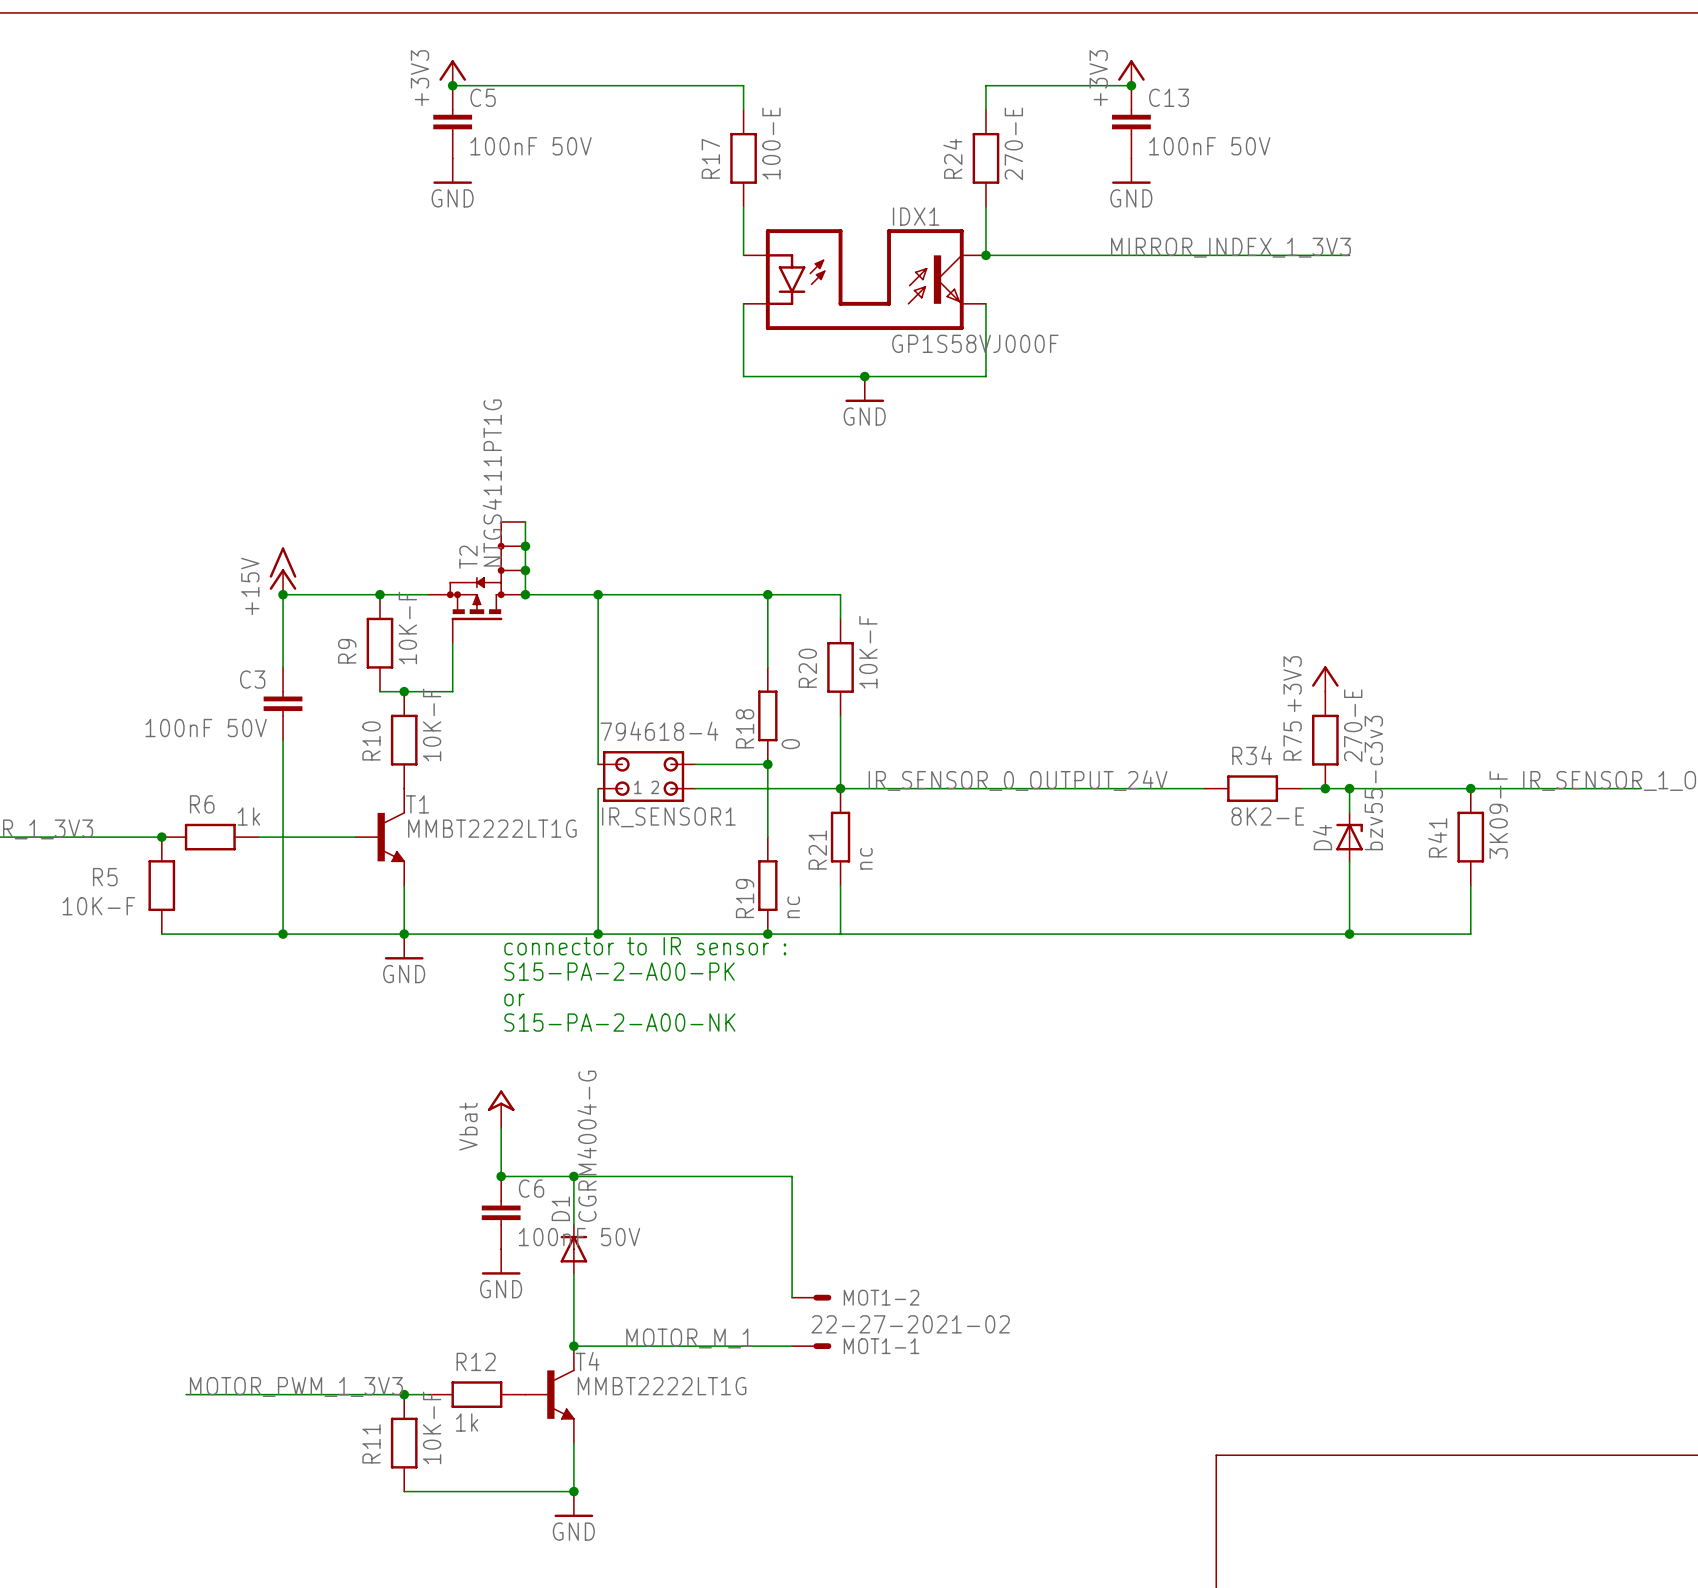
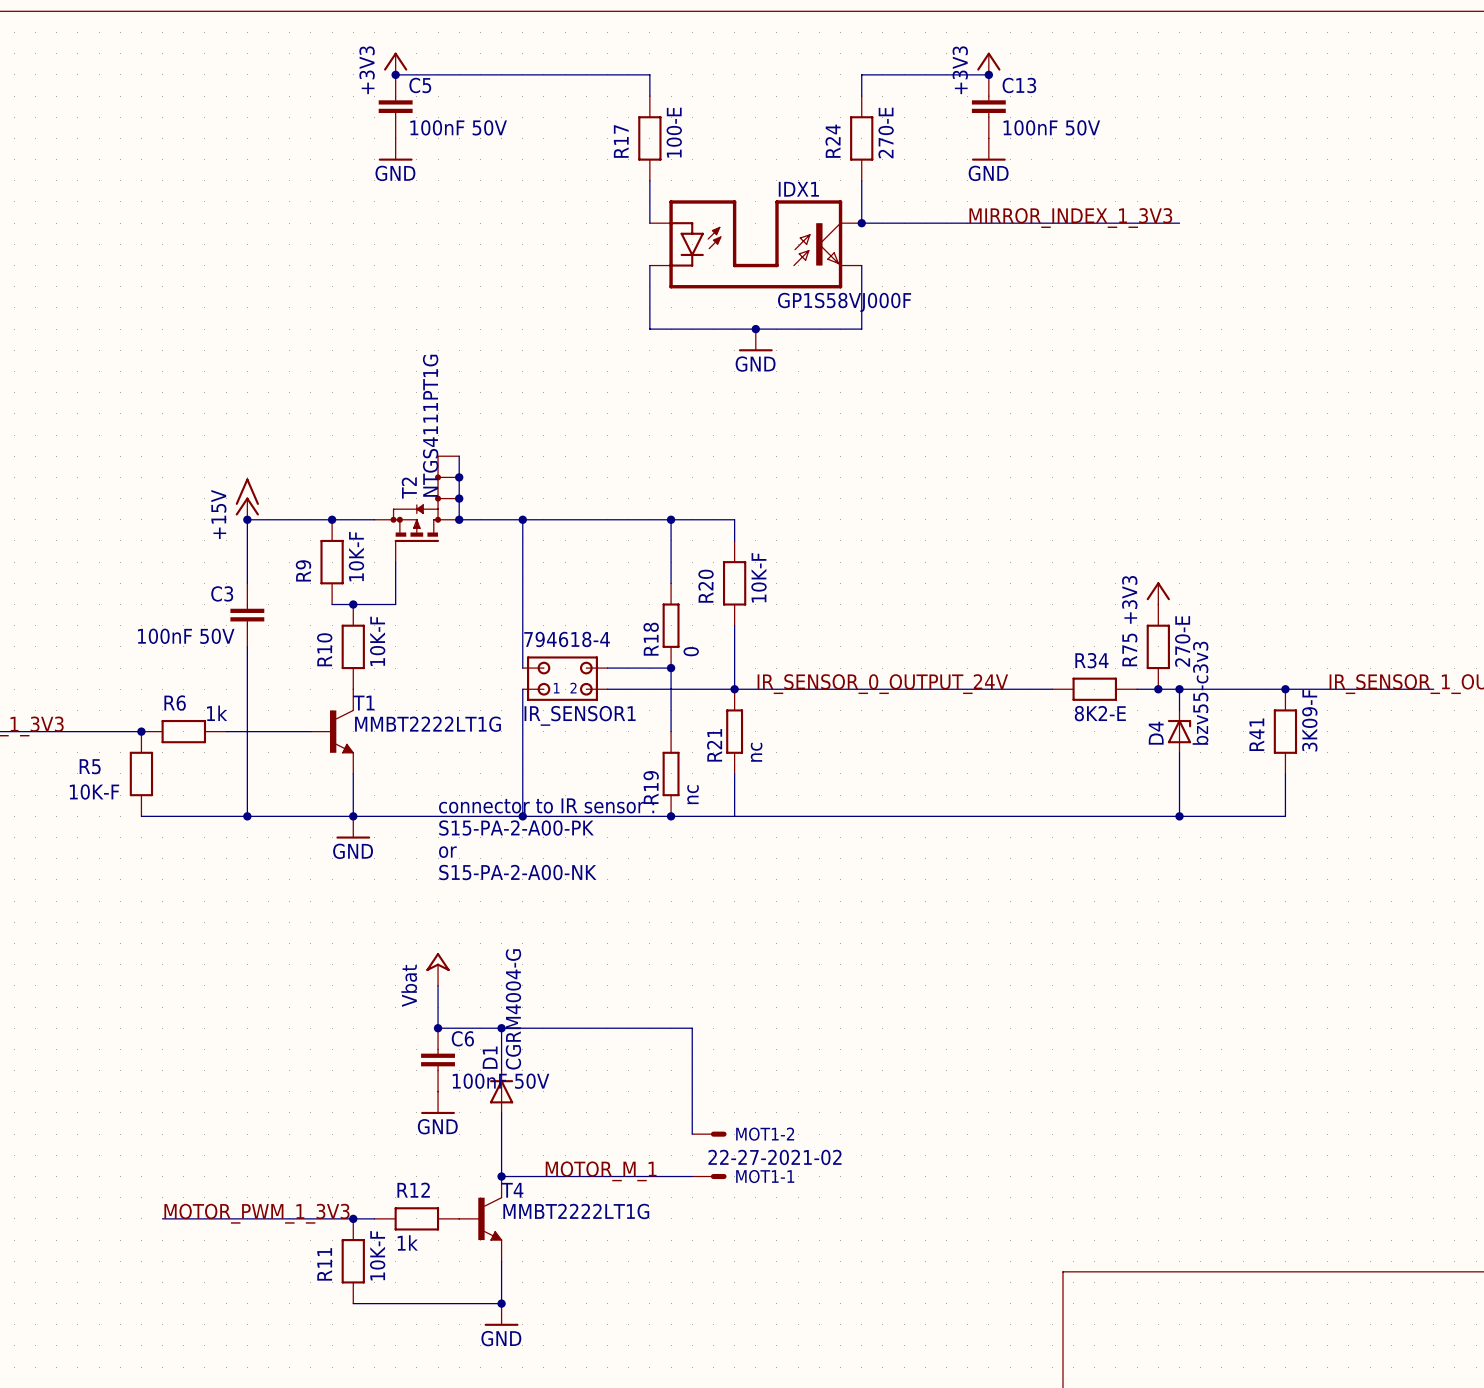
text: none -> connector to IR sensor : (546, 805)
text: connector to IR sensor : (645, 946) -> S15-PA-2-A00-PK (516, 828)
text: S15-PA-2-A00-PK (619, 971) -> or (447, 852)
text: or (514, 999) -> S15-PA-2-A00-NK (517, 872)
text: S15-PA-2-A00-NK (619, 1022) -> none

